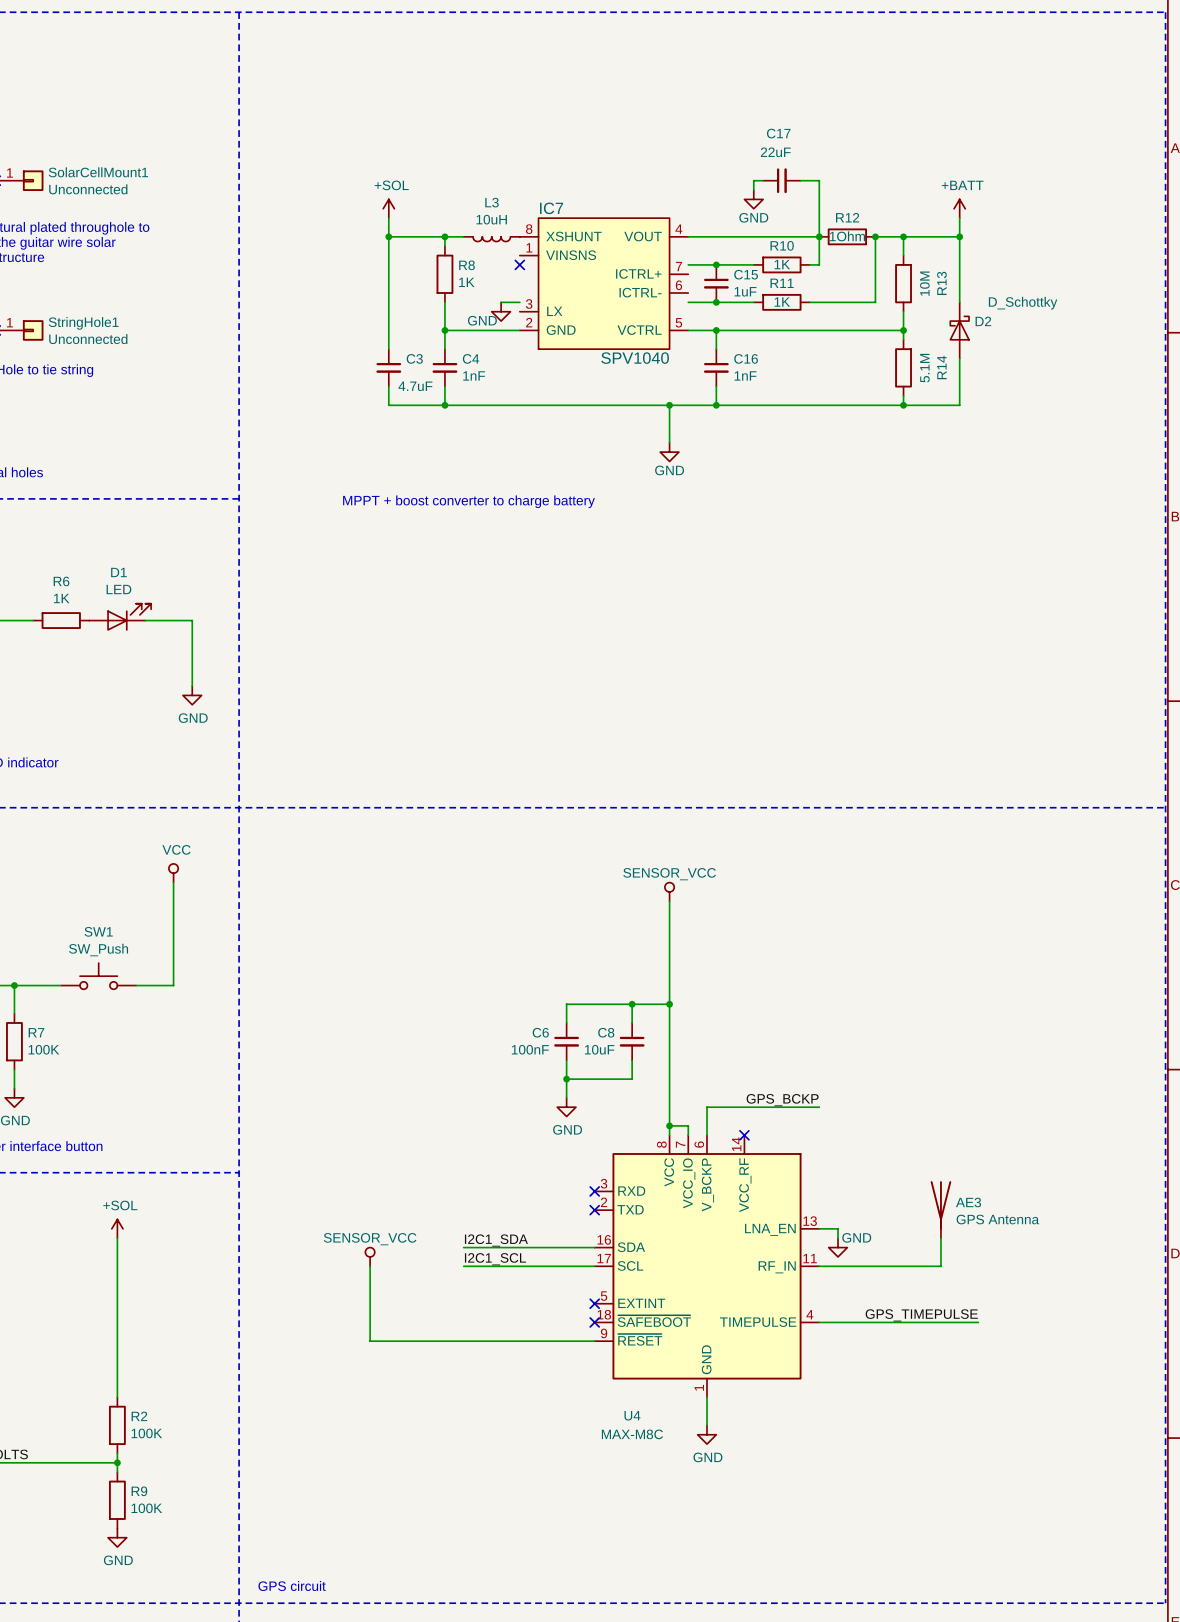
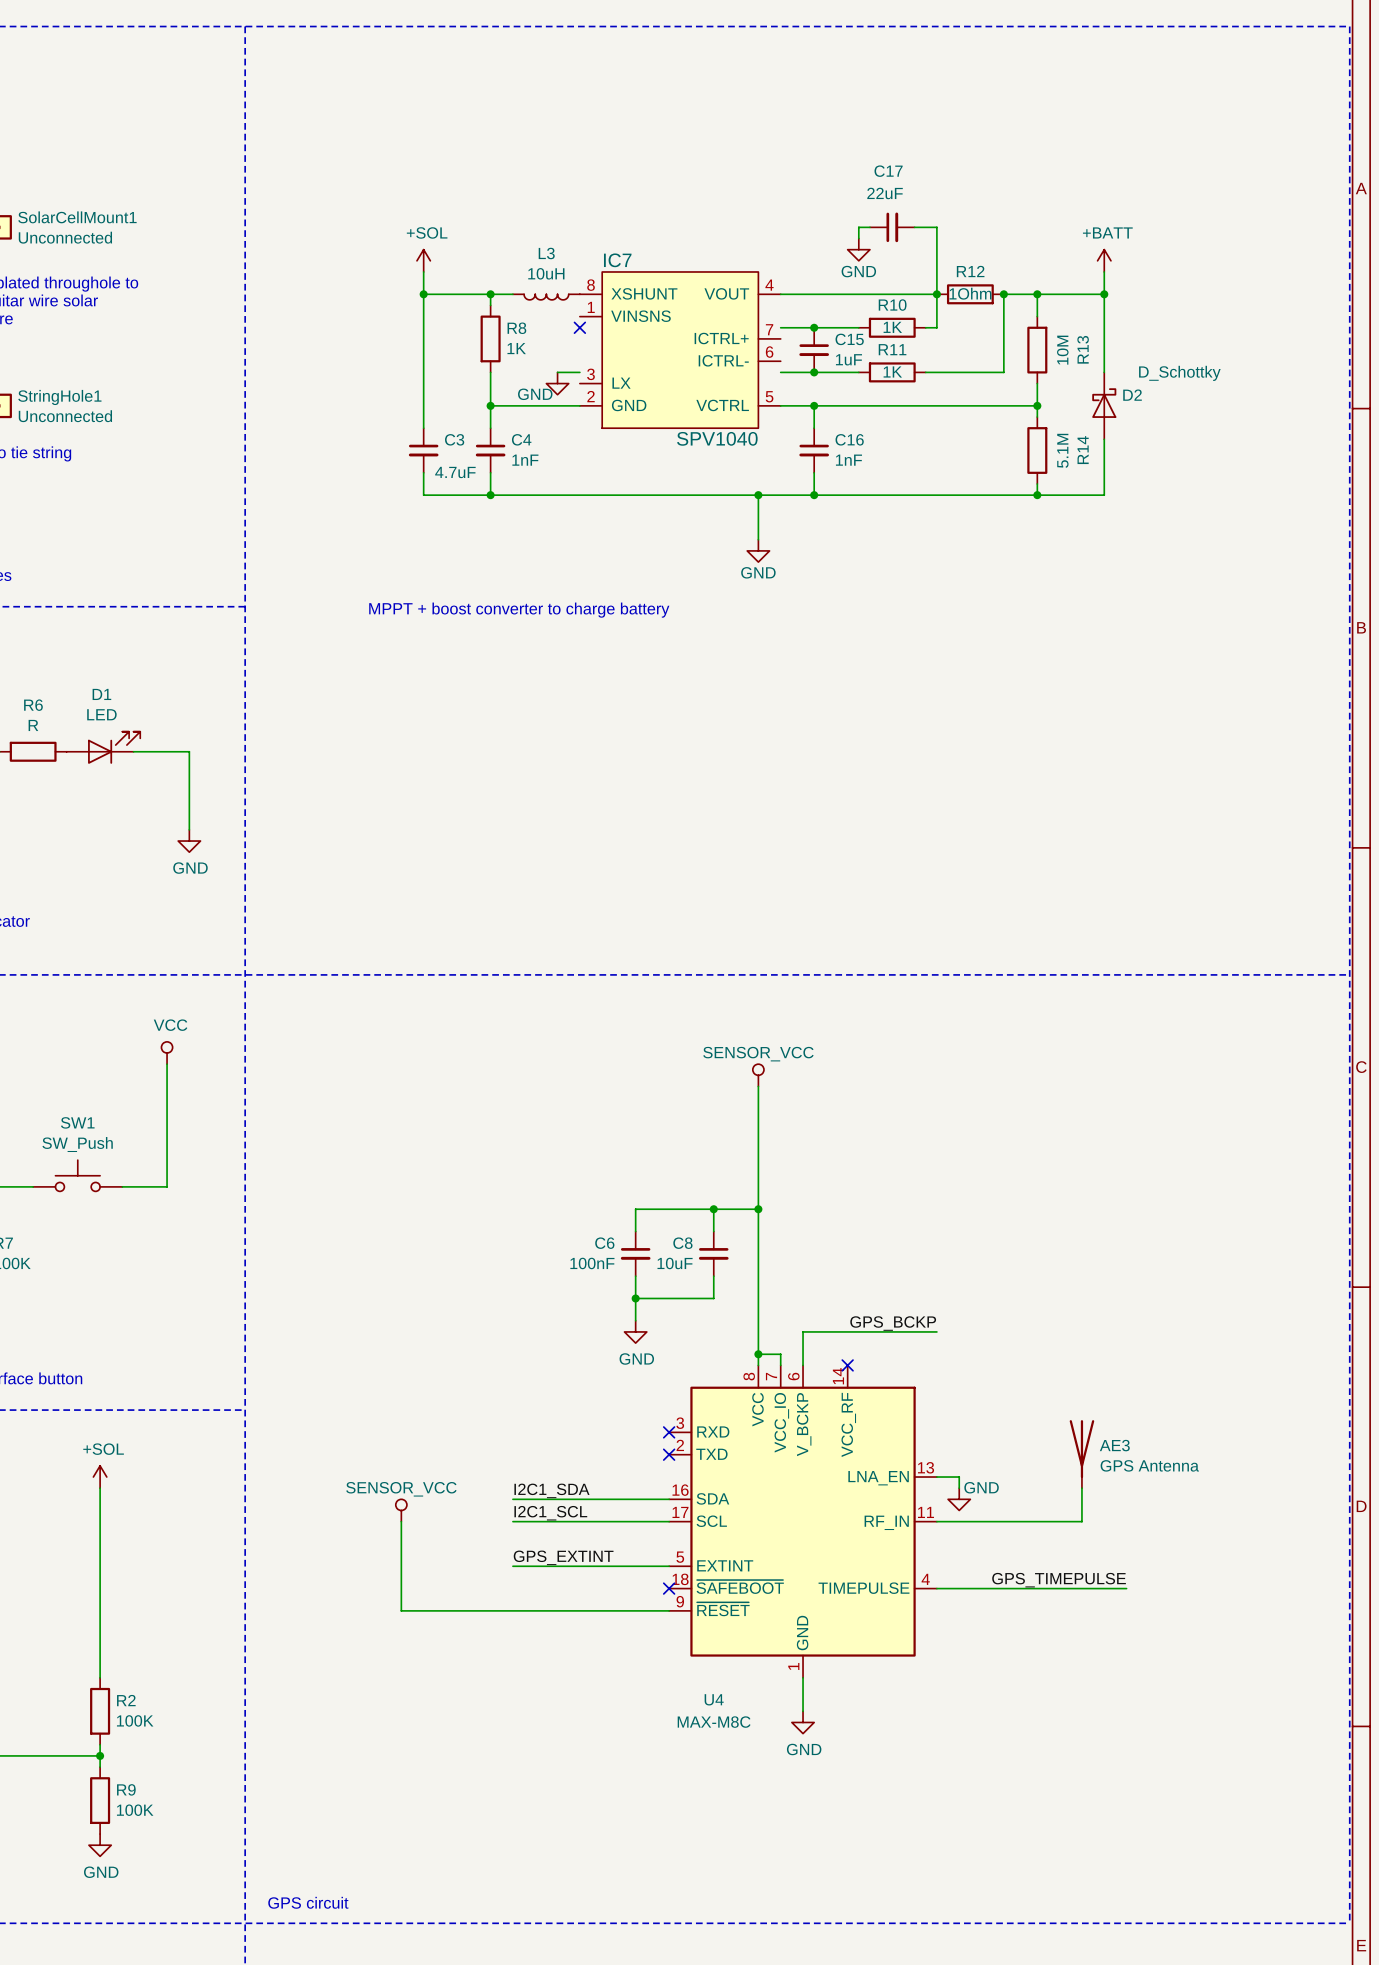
R6 value: 1K (61, 598) -> R (33, 725)
label: none -> GPS_EXTINT (563, 1557)
wire: none -> (512, 1566) (669, 1566)
no-connect mark: (594, 1303) -> none

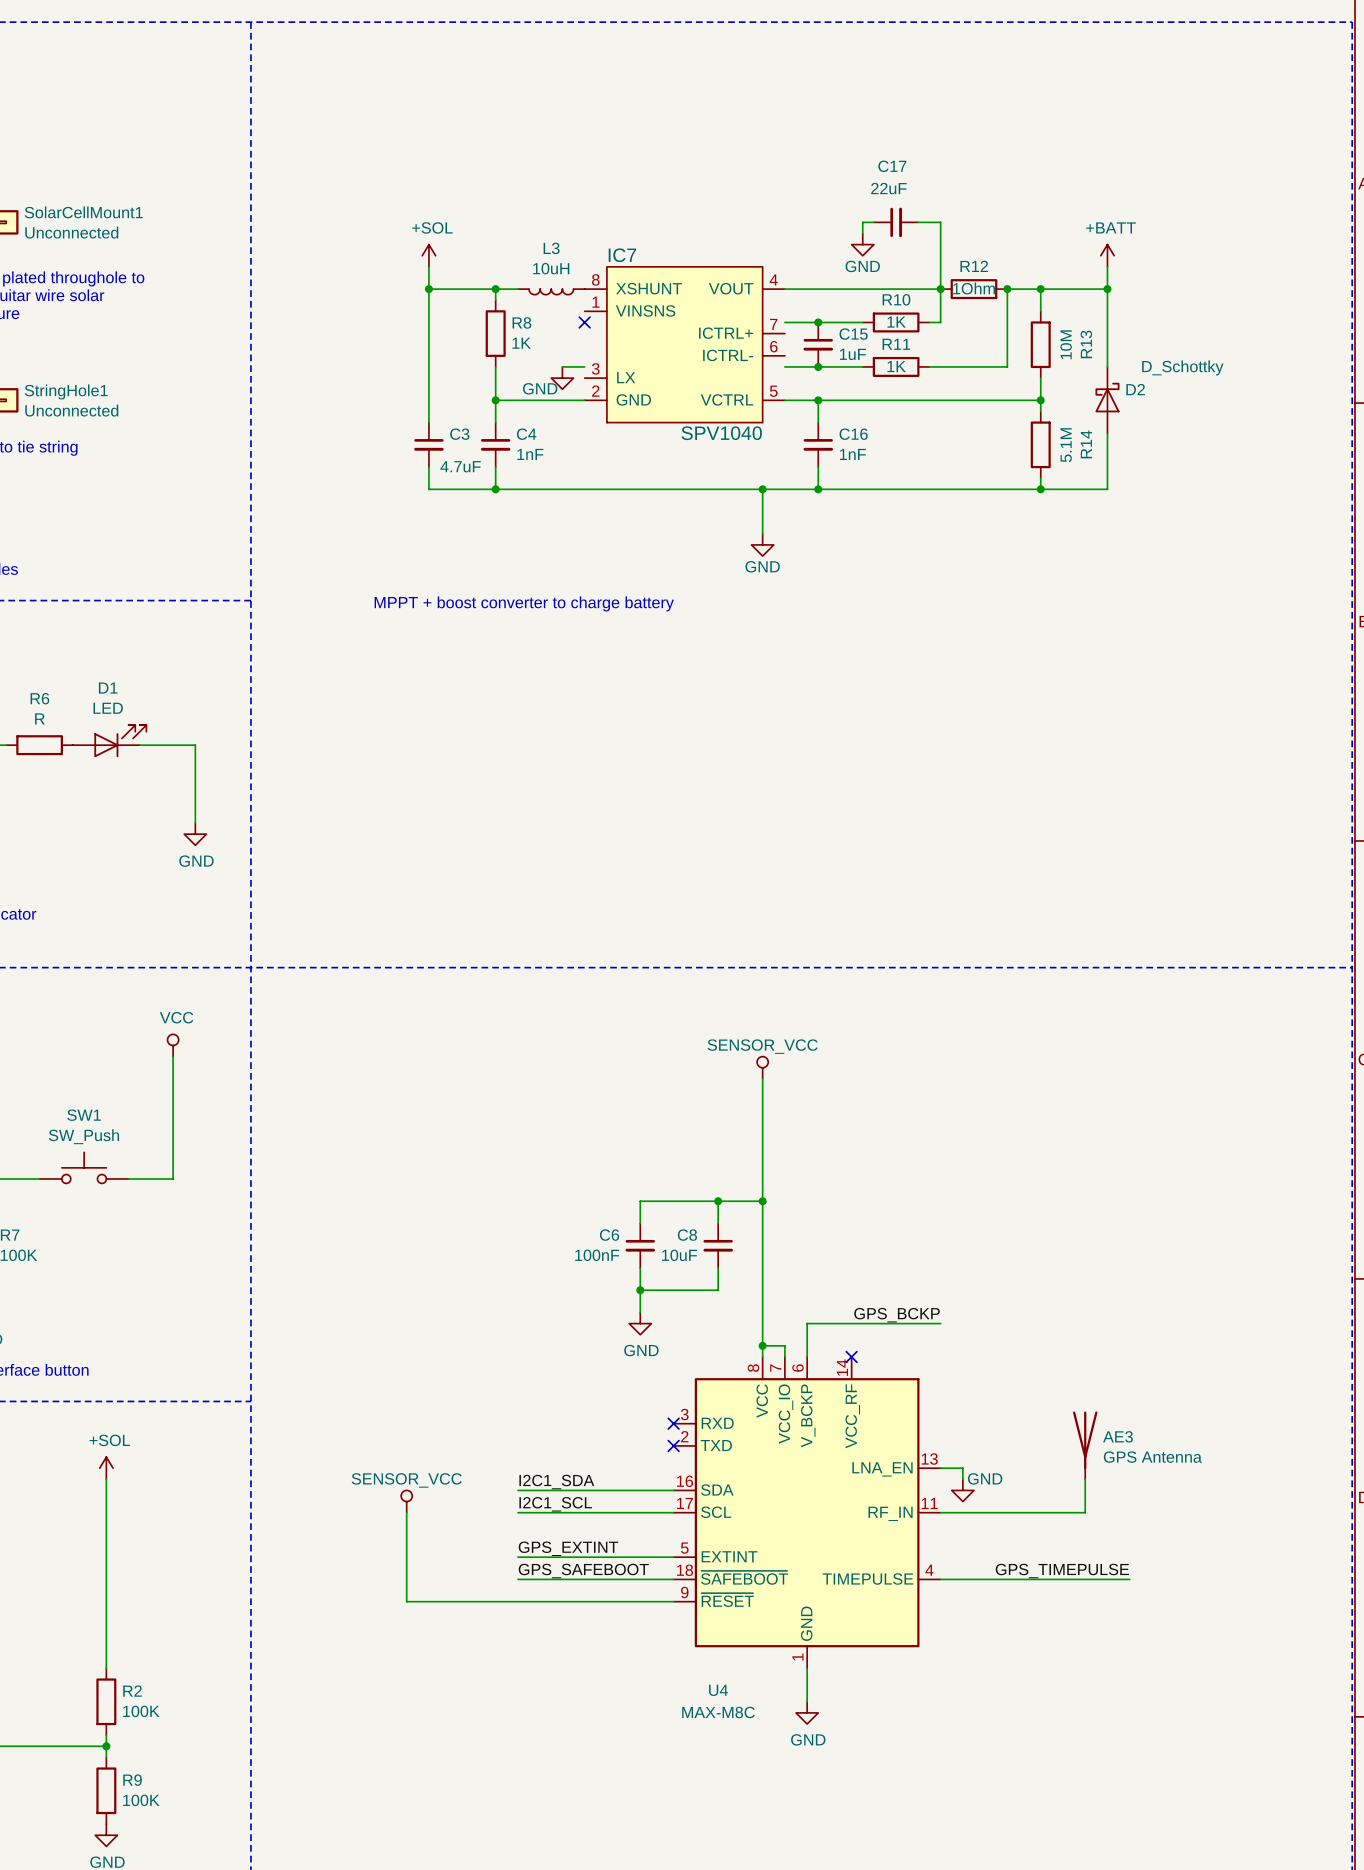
label: none -> GPS_SAFEBOOT (583, 1571)
wire: none -> (517, 1579) (673, 1579)
no-connect mark: (669, 1588) -> none

